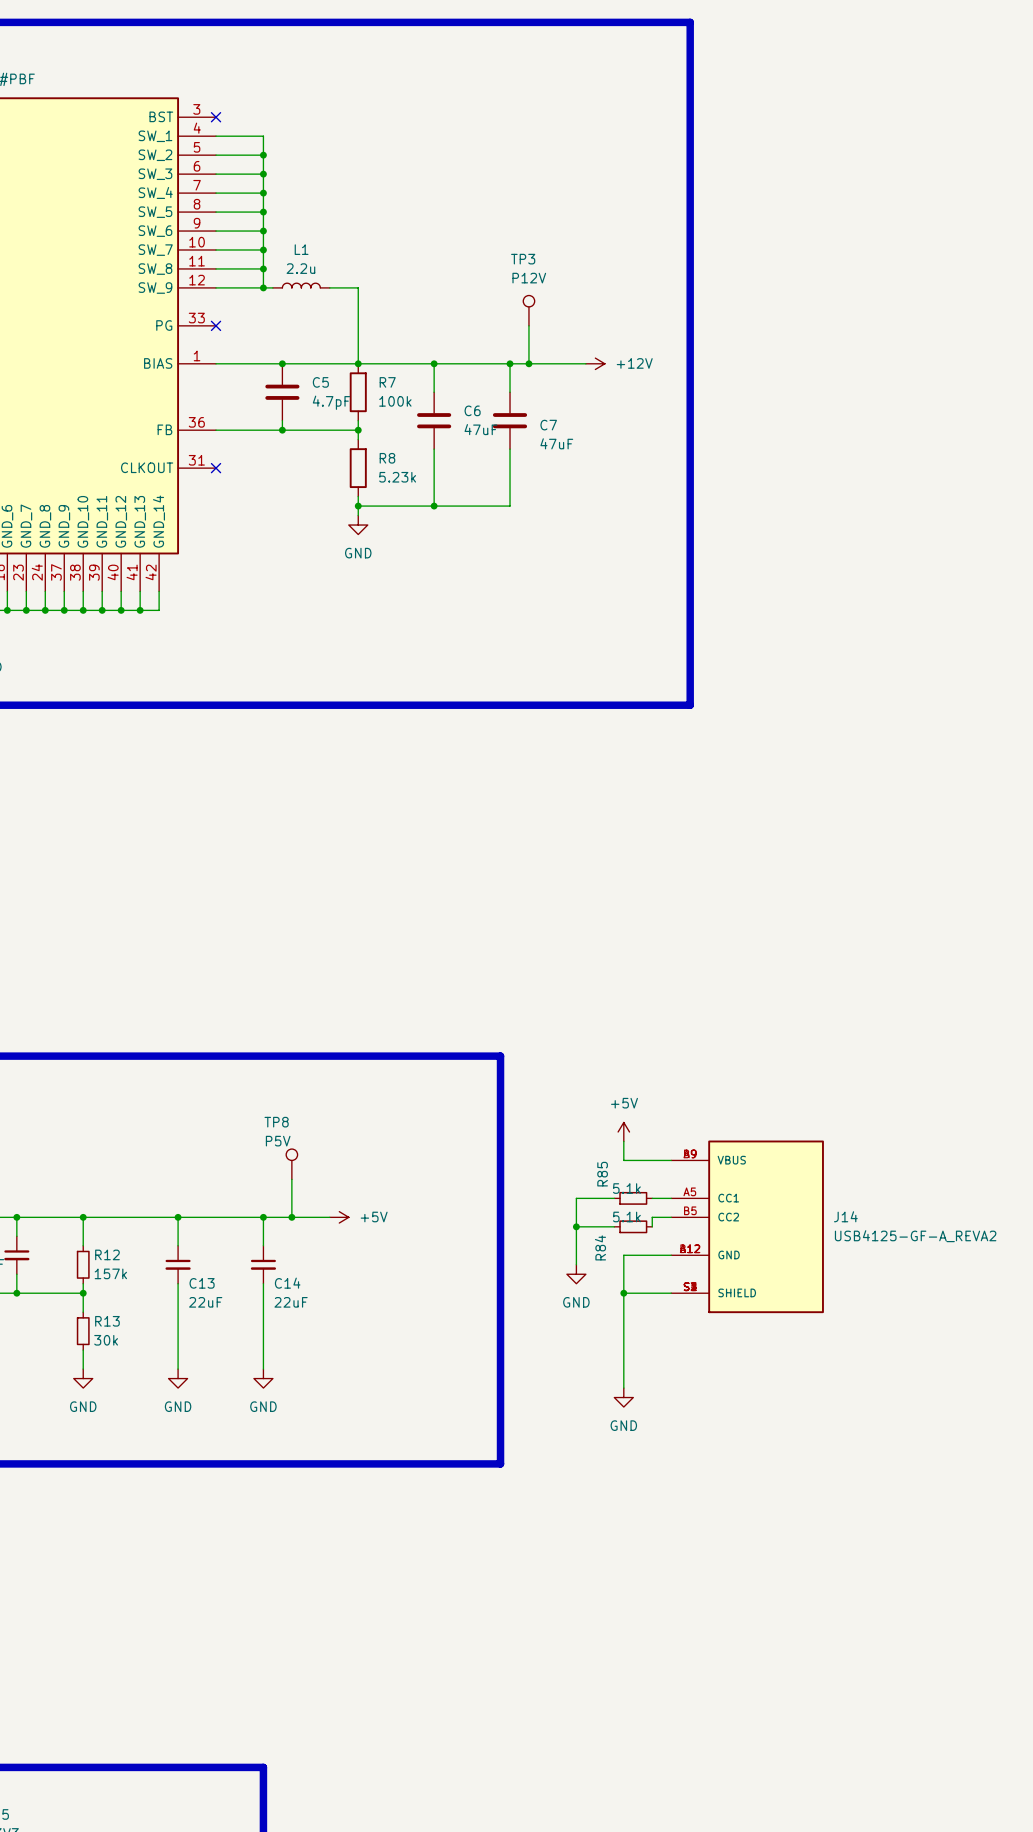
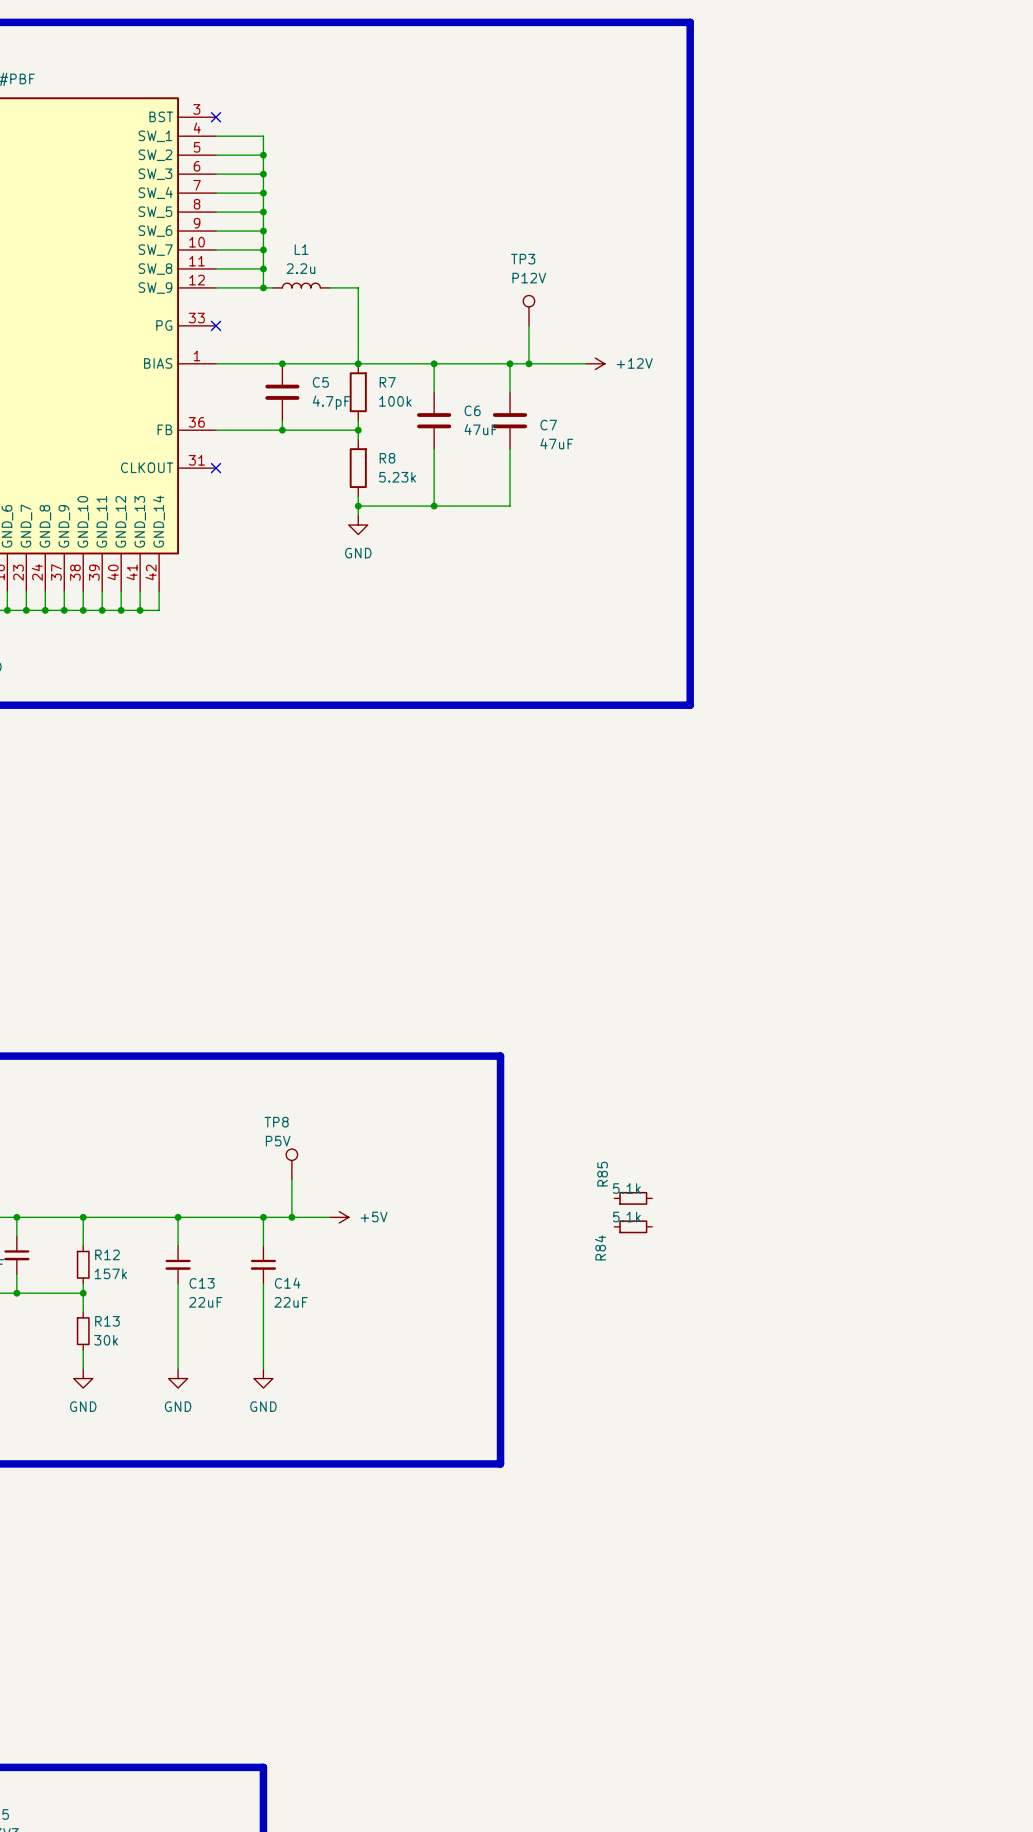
power symbol: +5V (623, 1131) -> none
wire: (623, 1141) (623, 1160) (671, 1160) -> none
wire: (614, 1198) (576, 1198) (576, 1264) -> none
wire: (652, 1198) (671, 1198) -> none
wire: (671, 1217) (652, 1217) (652, 1226) -> none
wire: (576, 1226) (614, 1226) -> none
junction: (576, 1226) -> none
J14: USB4125-GF-A_REVA2 (747, 1226) -> none
wire: (671, 1255) (623, 1255) (623, 1388) -> none
power symbol: GND (576, 1274) -> none
wire: (623, 1293) (671, 1293) -> none
junction: (623, 1293) -> none
power symbol: GND (623, 1397) -> none

